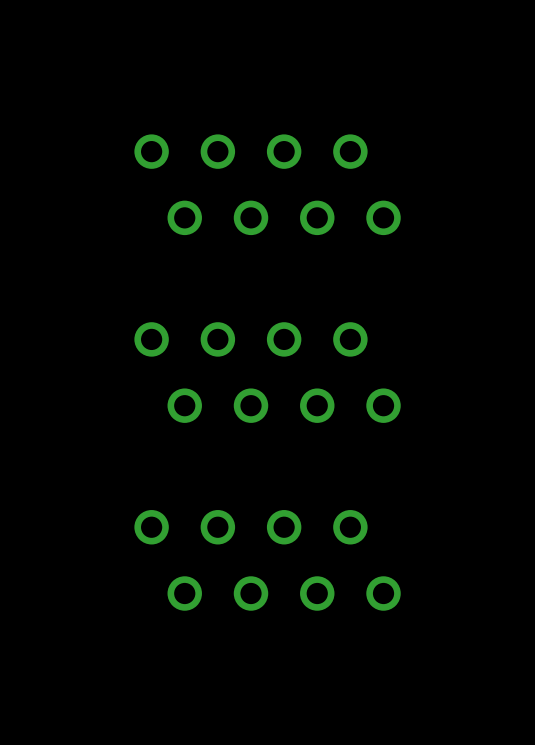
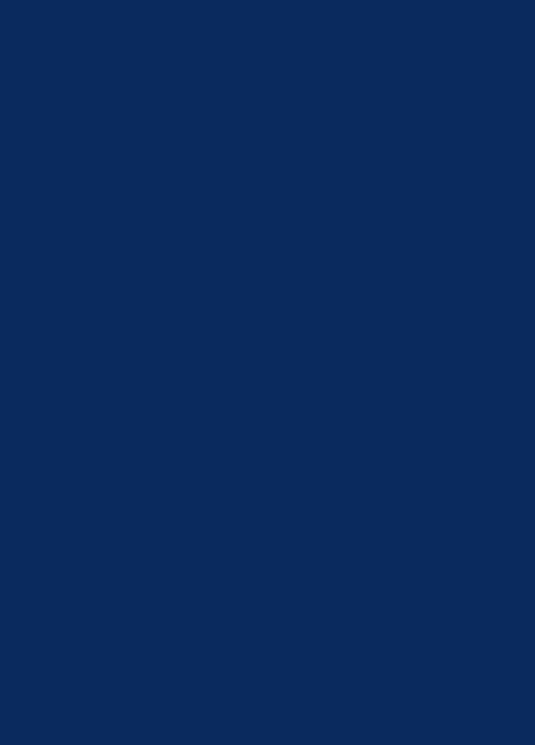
part: (267, 184) -> none
part: (267, 372) -> none
part: (267, 560) -> none

